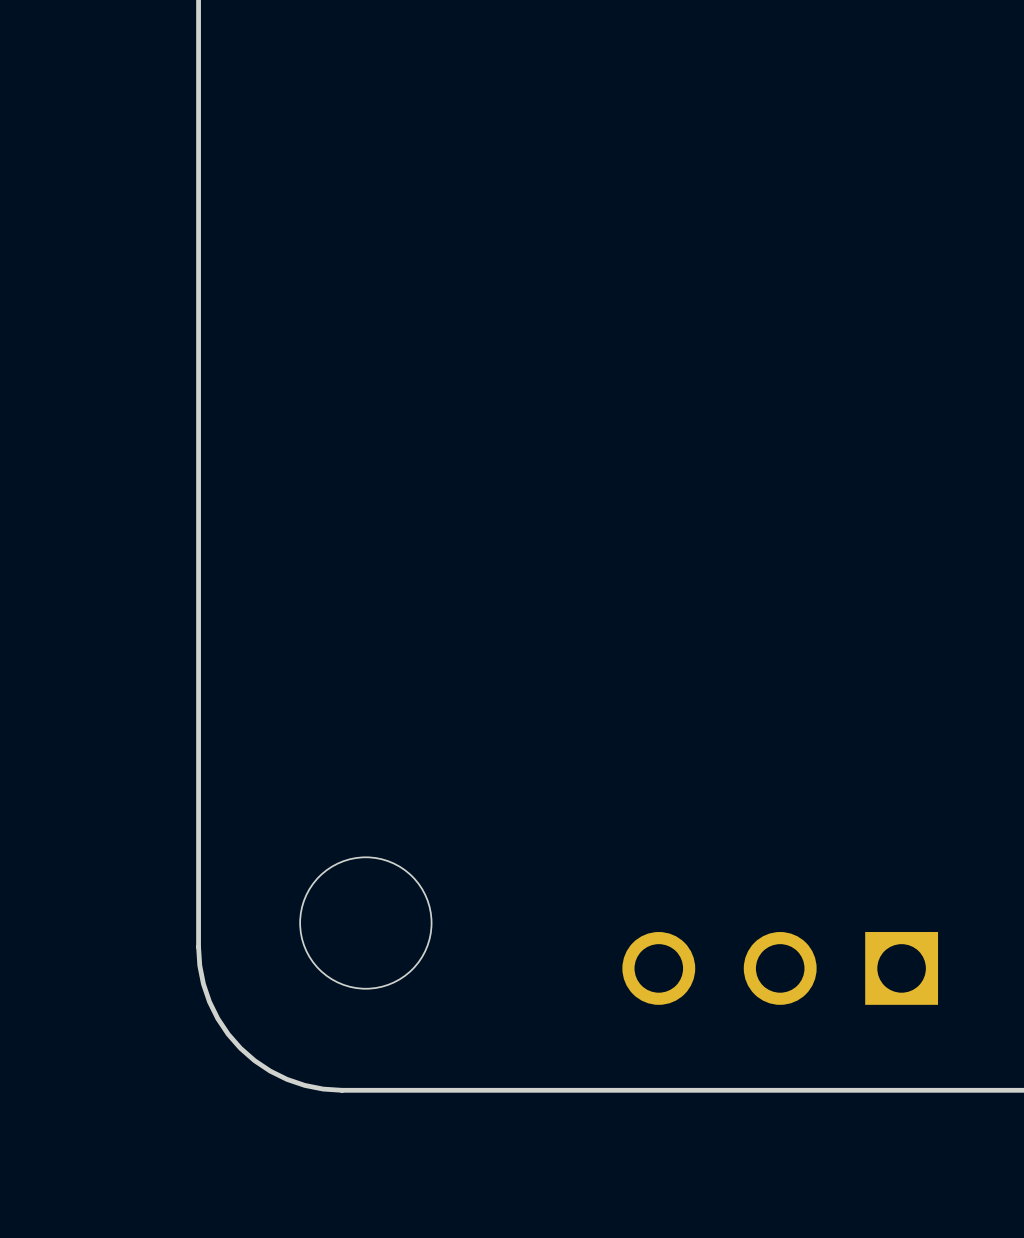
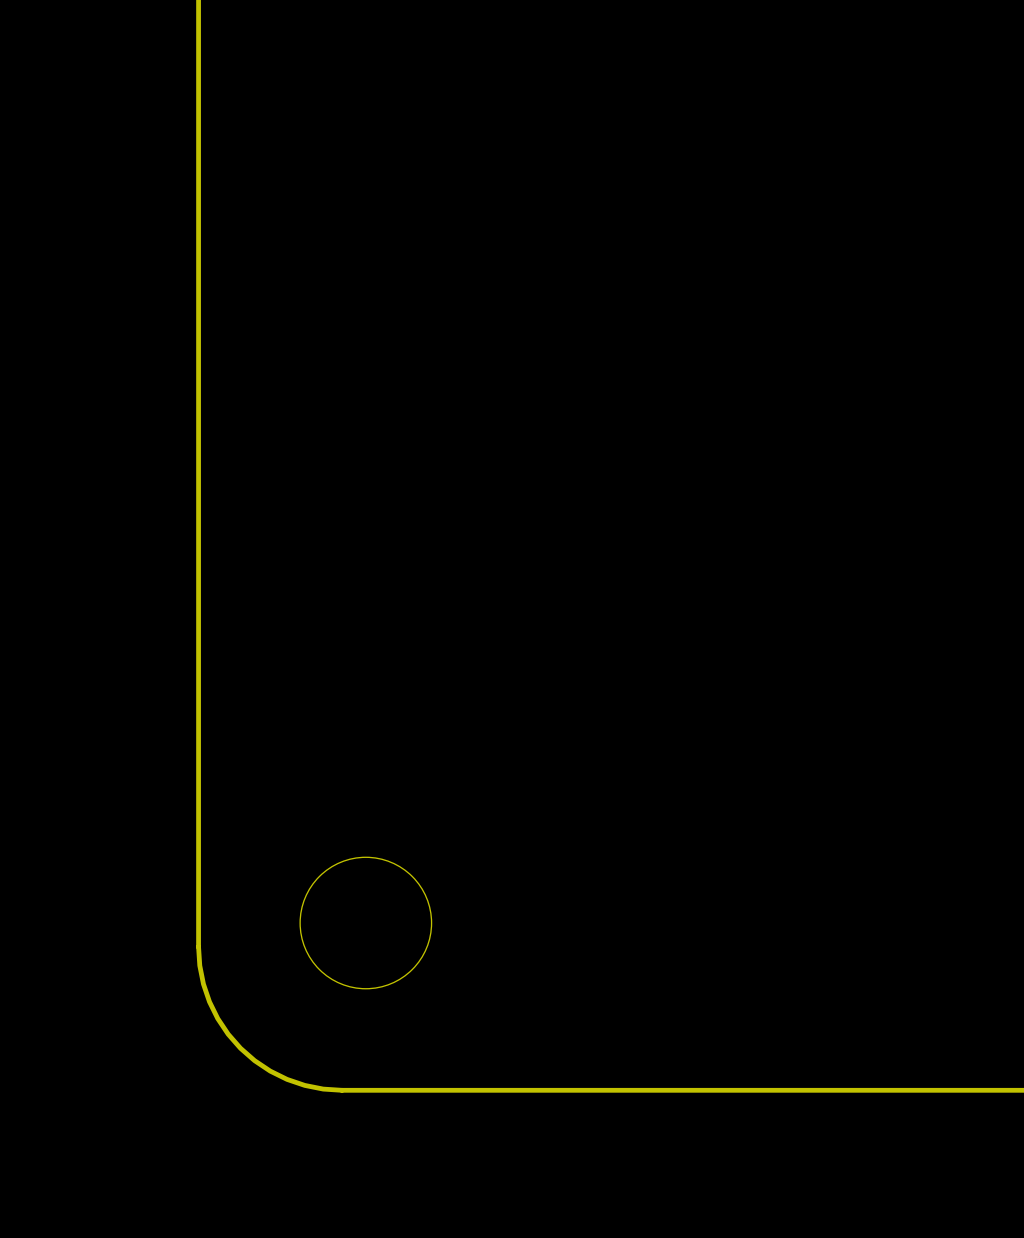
part: (780, 968) -> none

